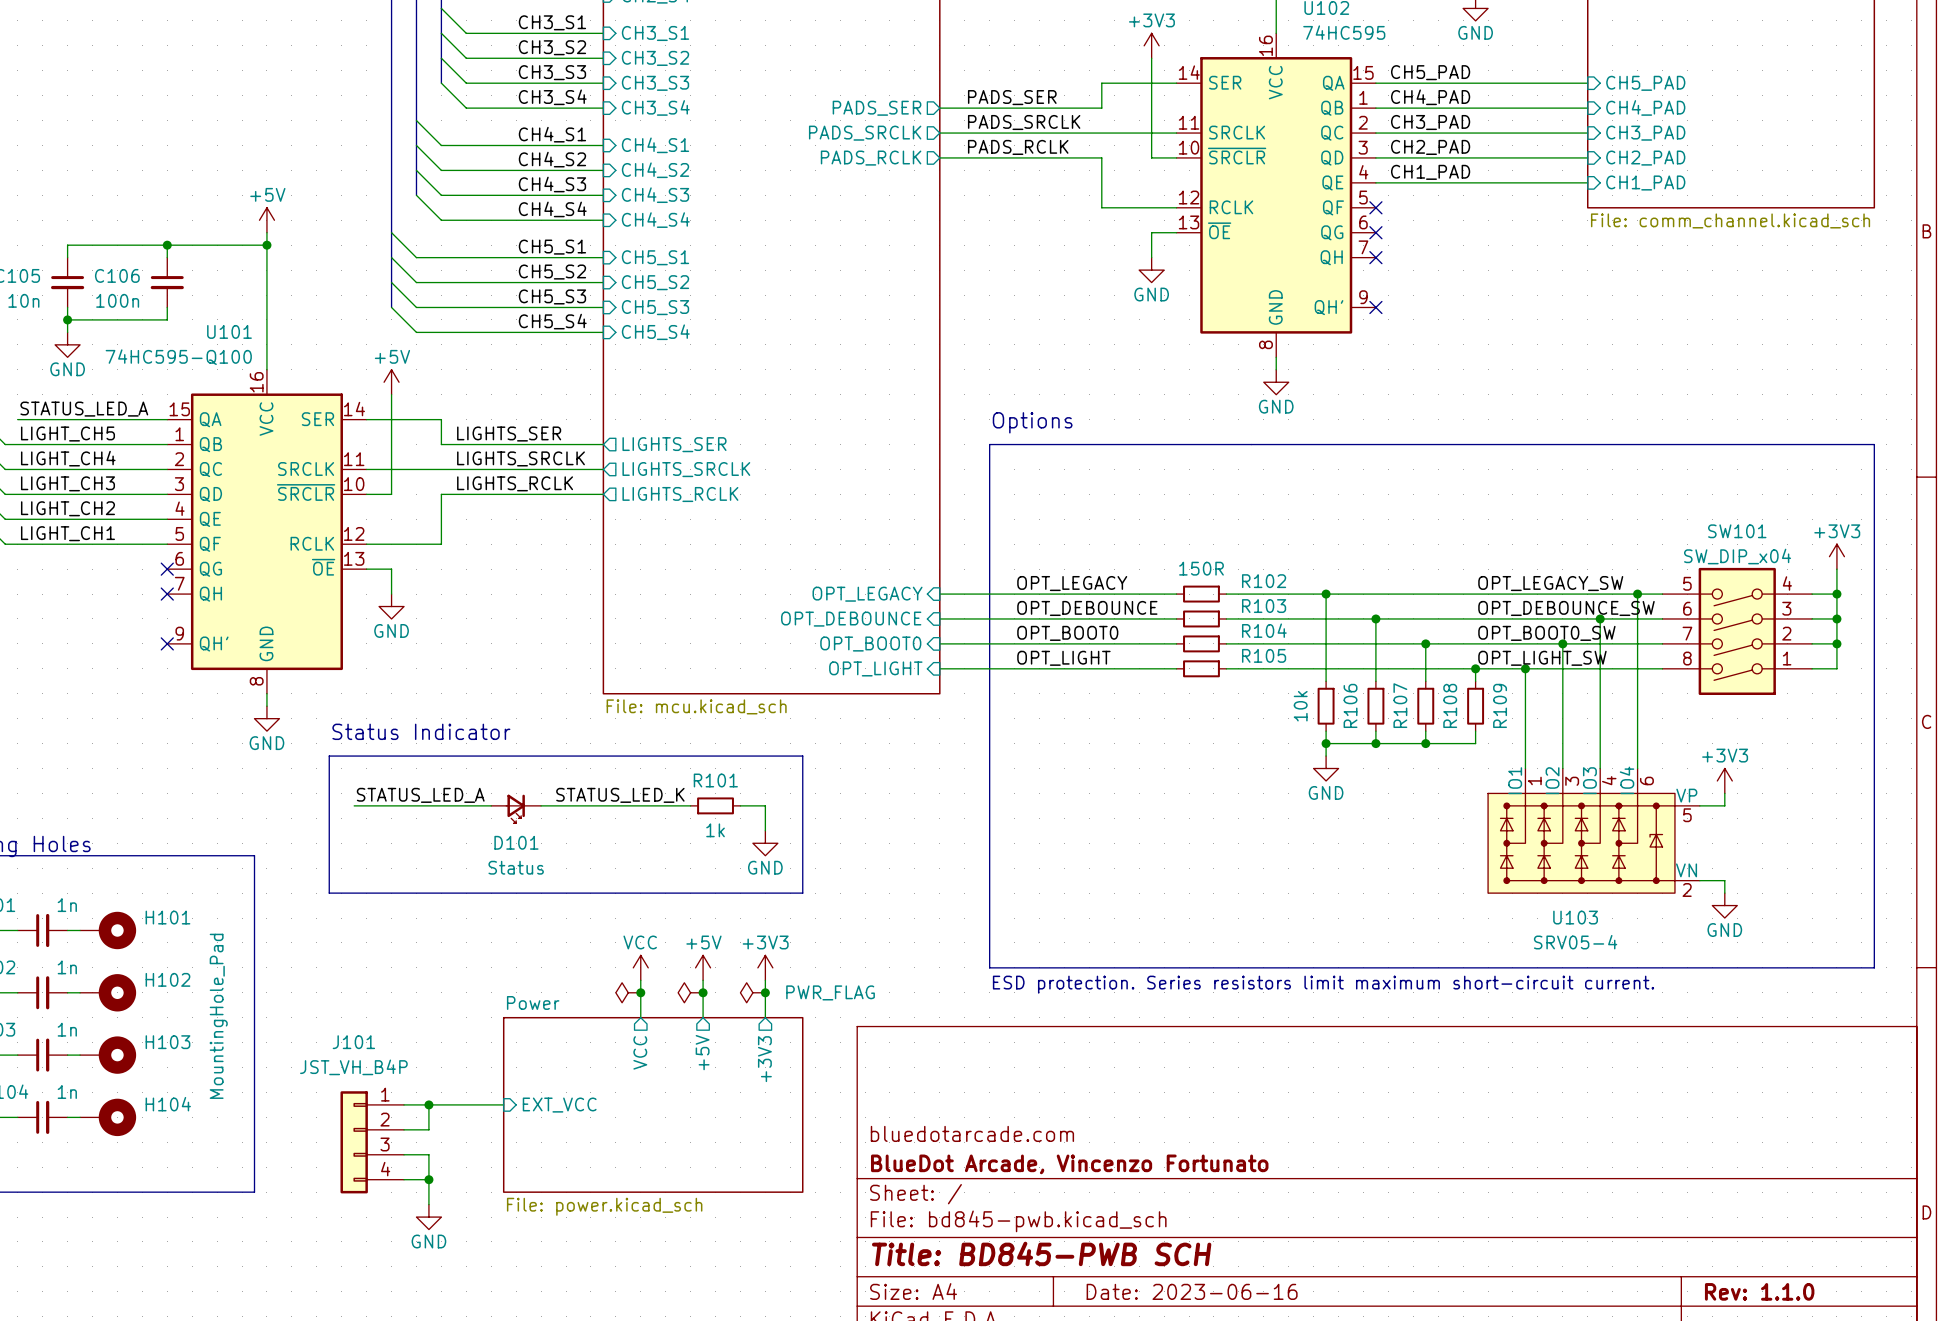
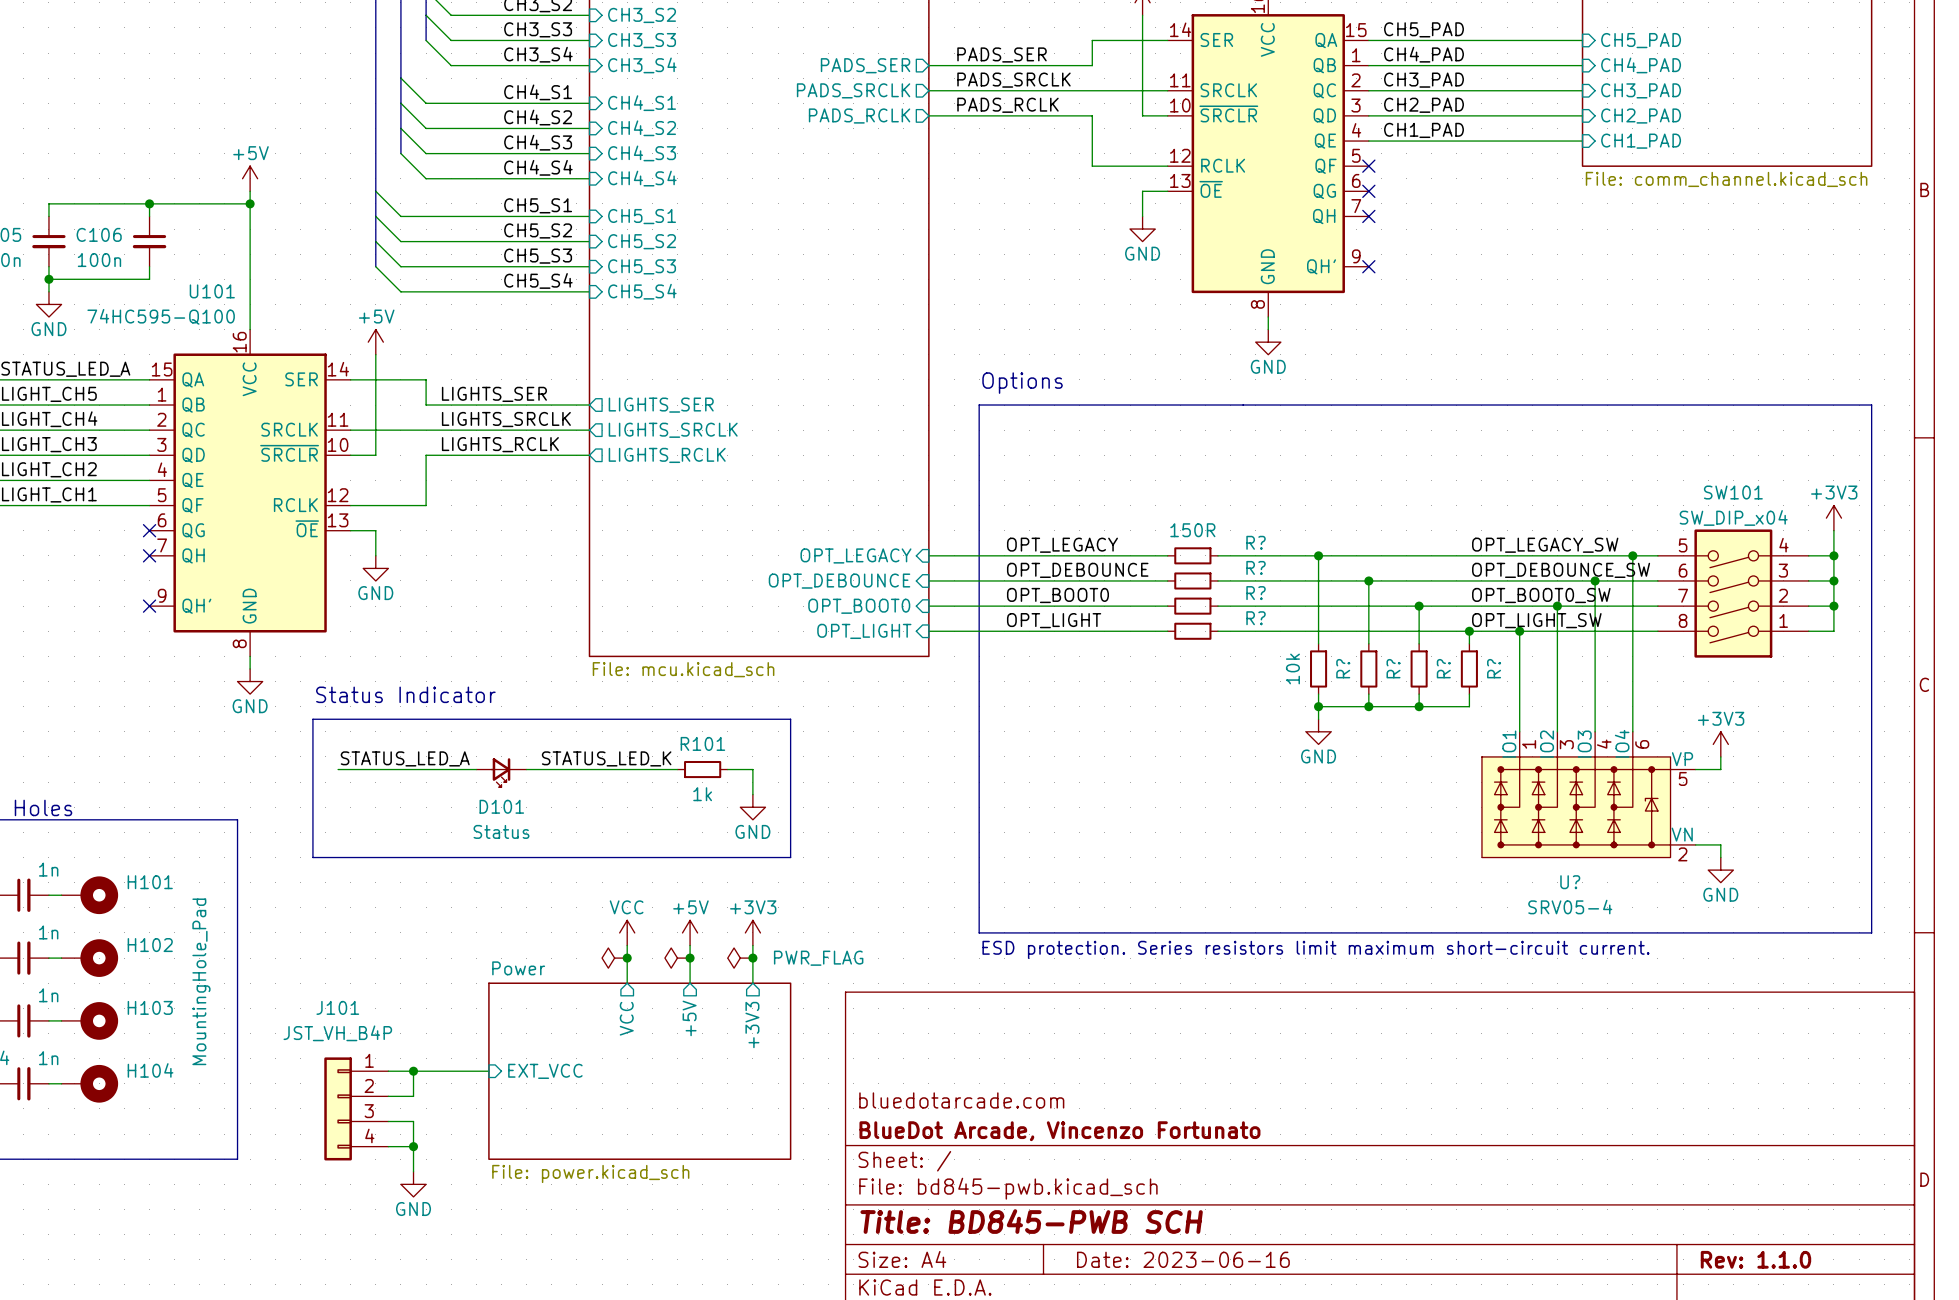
R102 name: R102 (1264, 581) -> R? (1256, 542)
R103 name: R103 (1264, 606) -> R? (1256, 567)
R104 name: R104 (1264, 630) -> R? (1256, 593)
R105 name: R105 (1264, 655) -> R? (1256, 618)
R106 name: R106 (1350, 705) -> R? (1343, 668)
R107 name: R107 (1400, 705) -> R? (1393, 668)
R108 name: R108 (1450, 705) -> R? (1443, 668)
R109 name: R109 (1500, 705) -> R? (1494, 668)
U103 name: U103 (1575, 917) -> U? (1570, 882)

